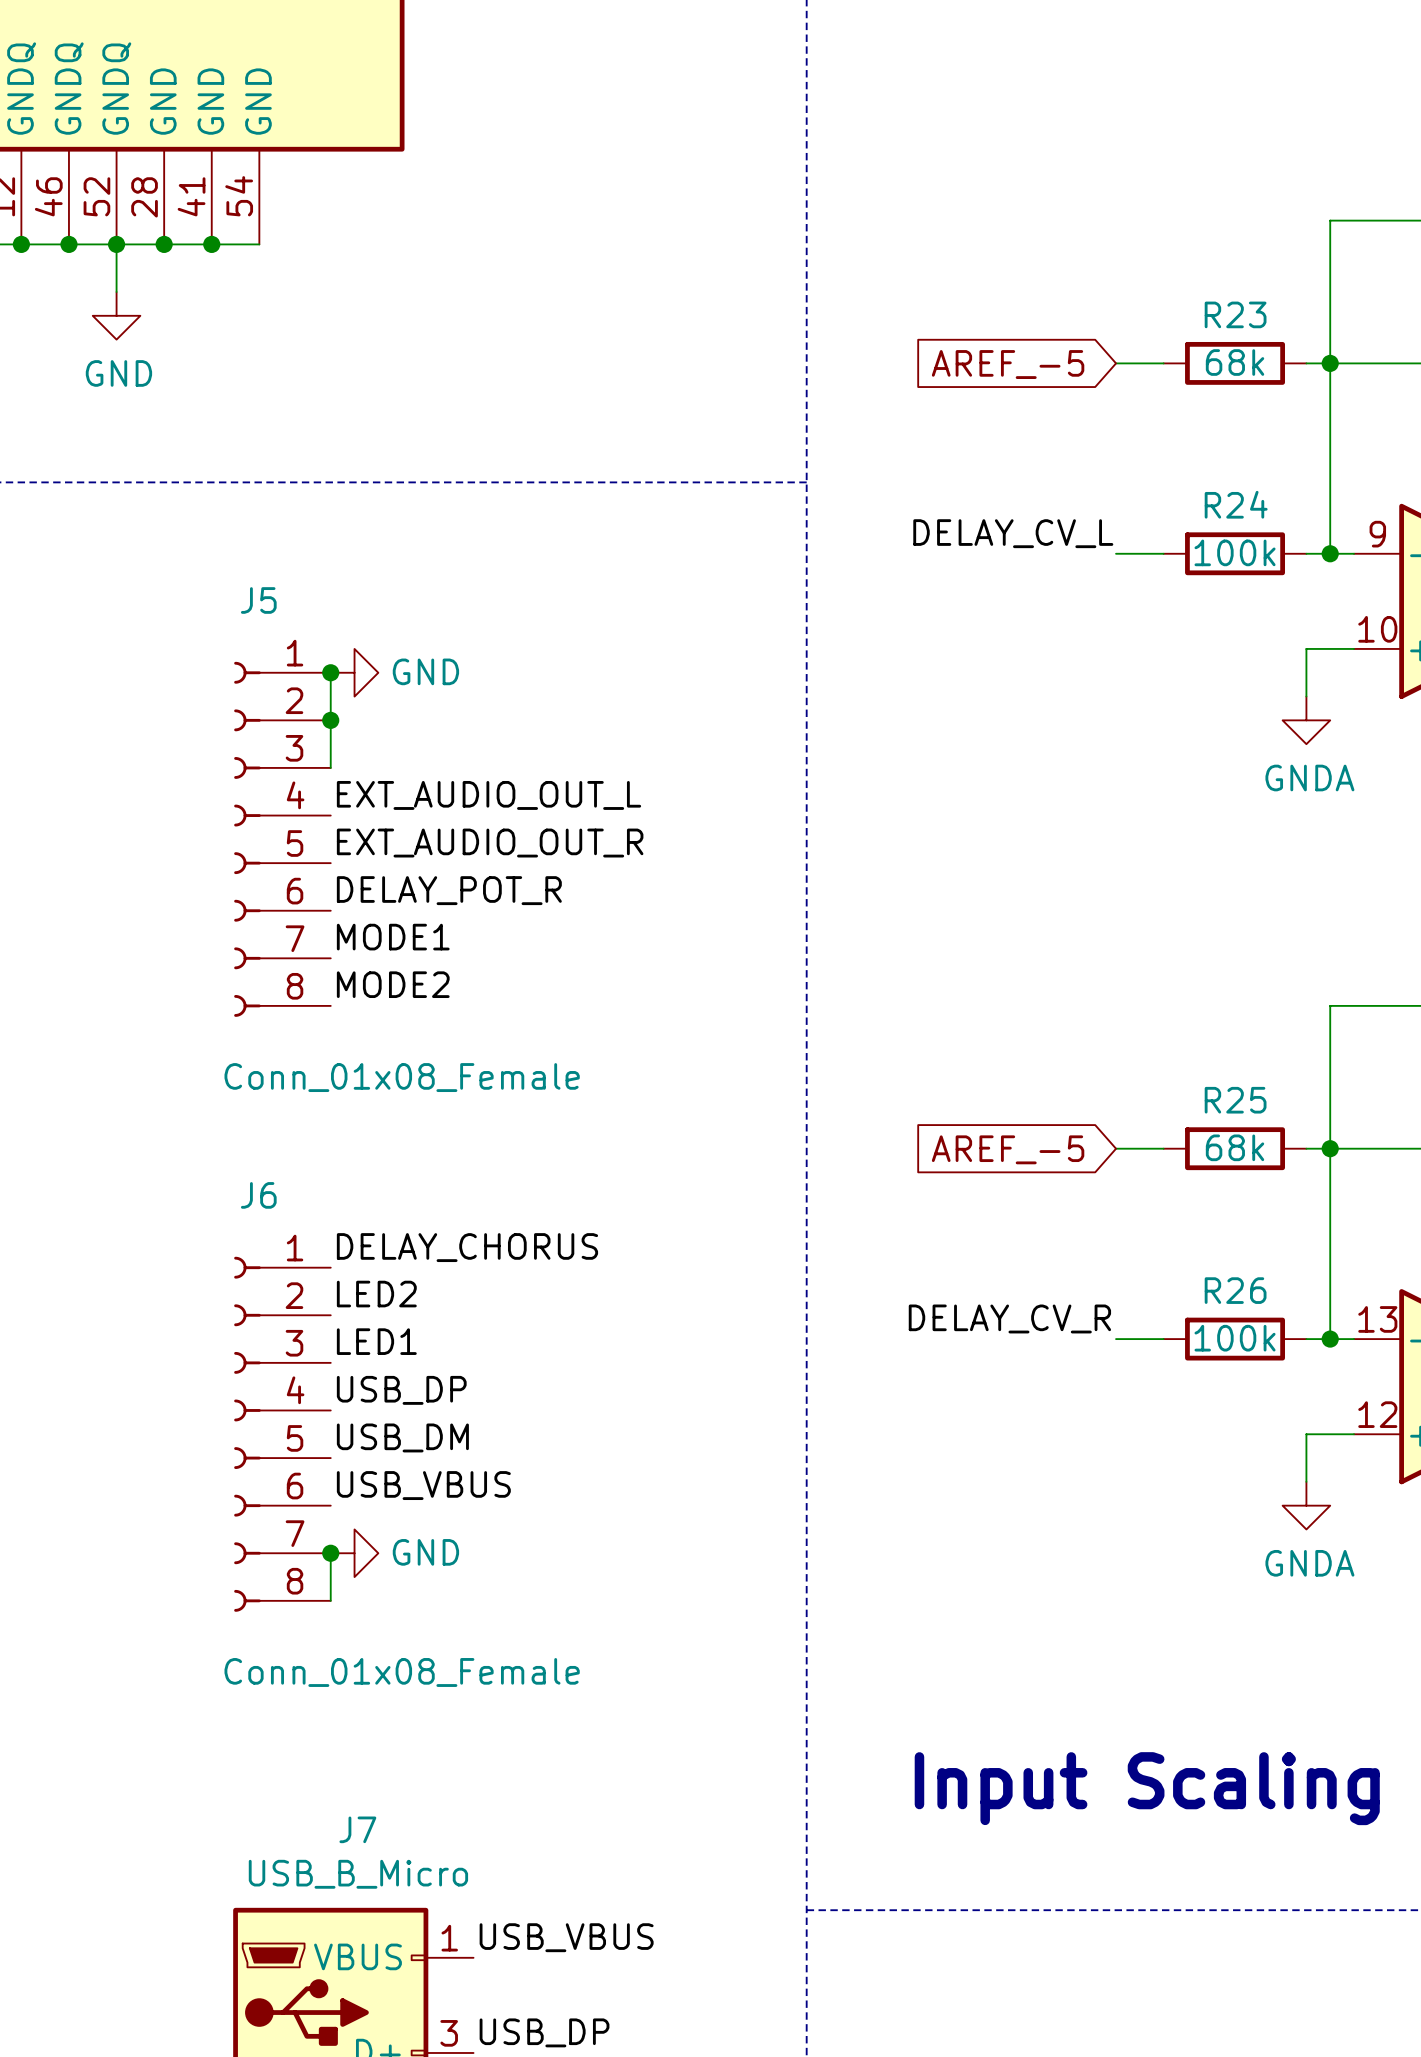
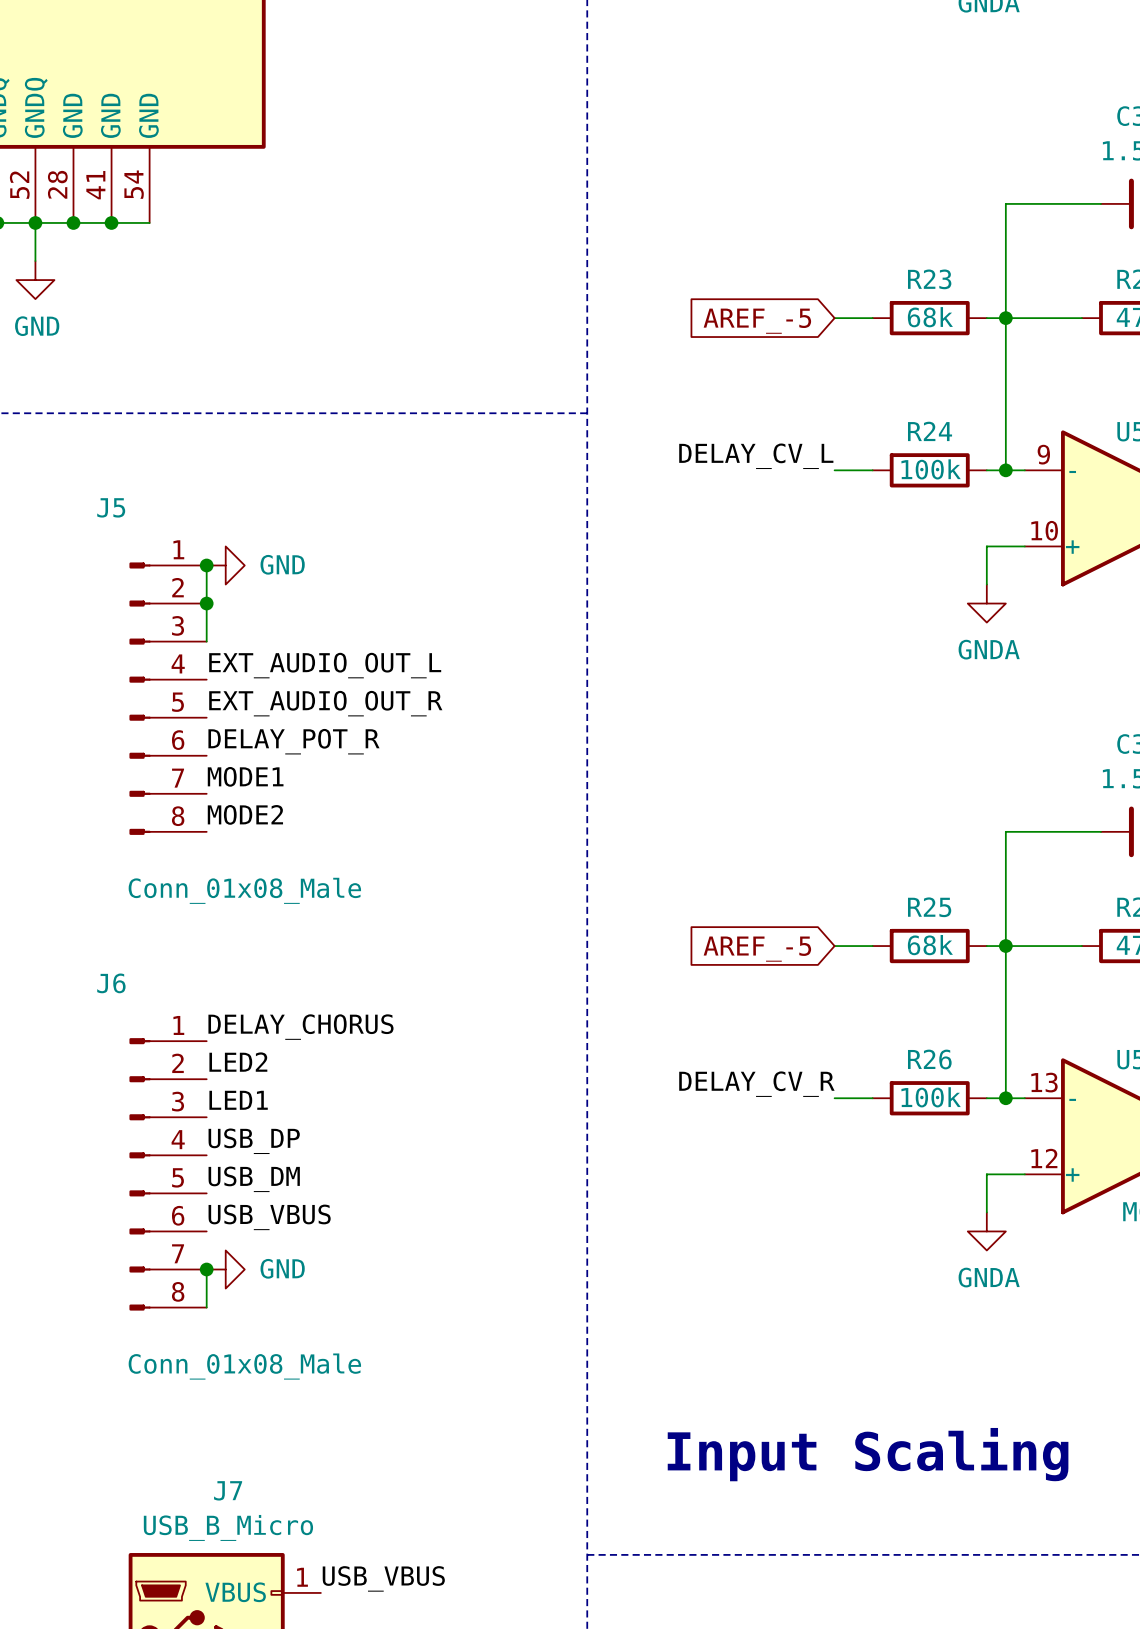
J5 name position: J5 (258, 600) -> J5 (111, 507)
J5 symbol: [234, 661, 331, 1017] -> [129, 562, 207, 835]
J5 value: Conn_01x08_Female (402, 1077) -> Conn_01x08_Male (244, 890)
J6 name position: J6 (258, 1195) -> J6 (111, 983)
J6 symbol: [234, 1256, 331, 1612] -> [129, 1038, 207, 1311]
J6 value: Conn_01x08_Female (402, 1672) -> Conn_01x08_Male (244, 1366)

